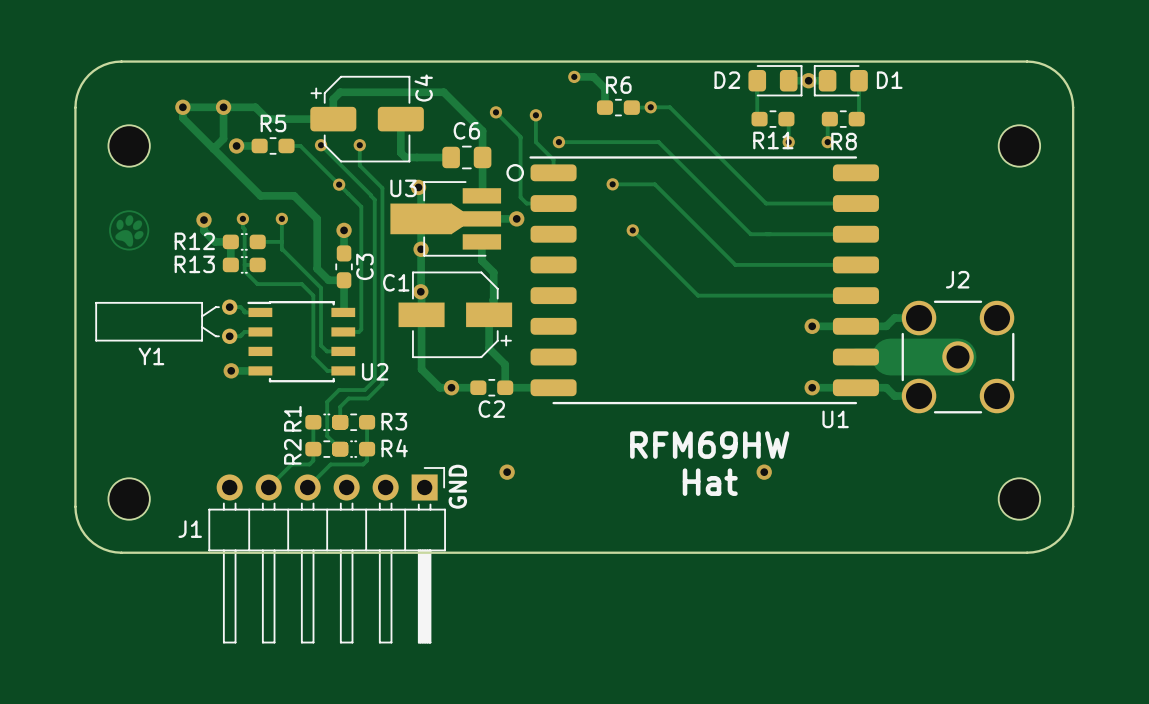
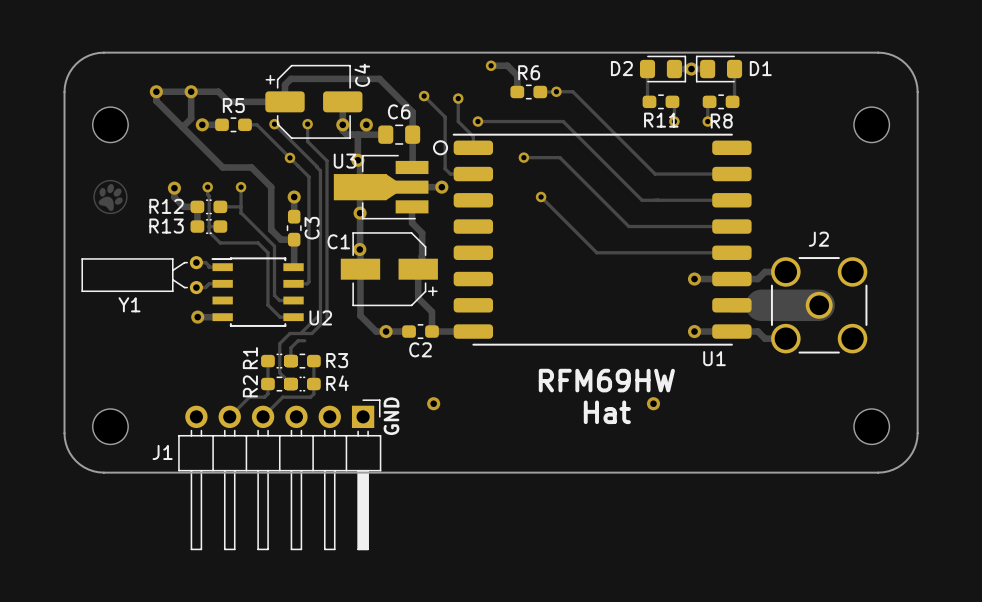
via: none -> (342, 124)
via: none -> (366, 124)
track: none -> (357, 134) (357, 160)
track: none -> (320, 313) (300, 333)
track: (382, 372) (382, 383) (367, 398) (356, 398) -> none

